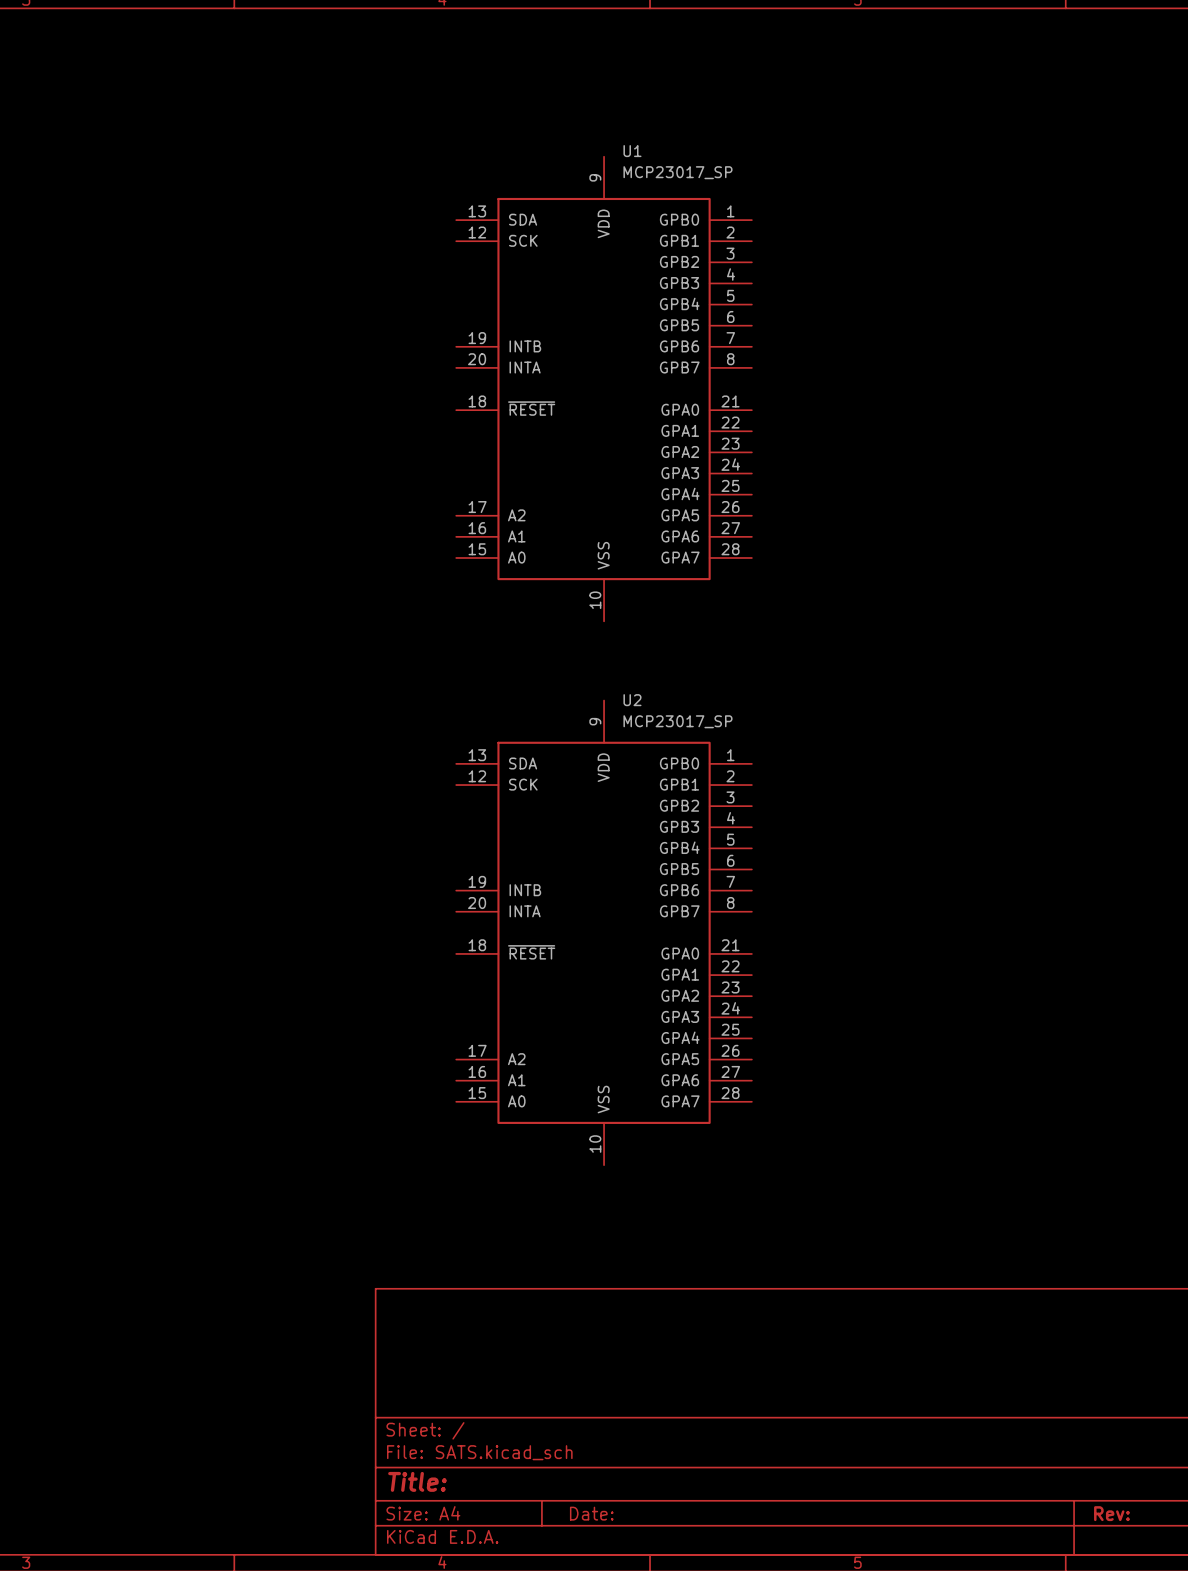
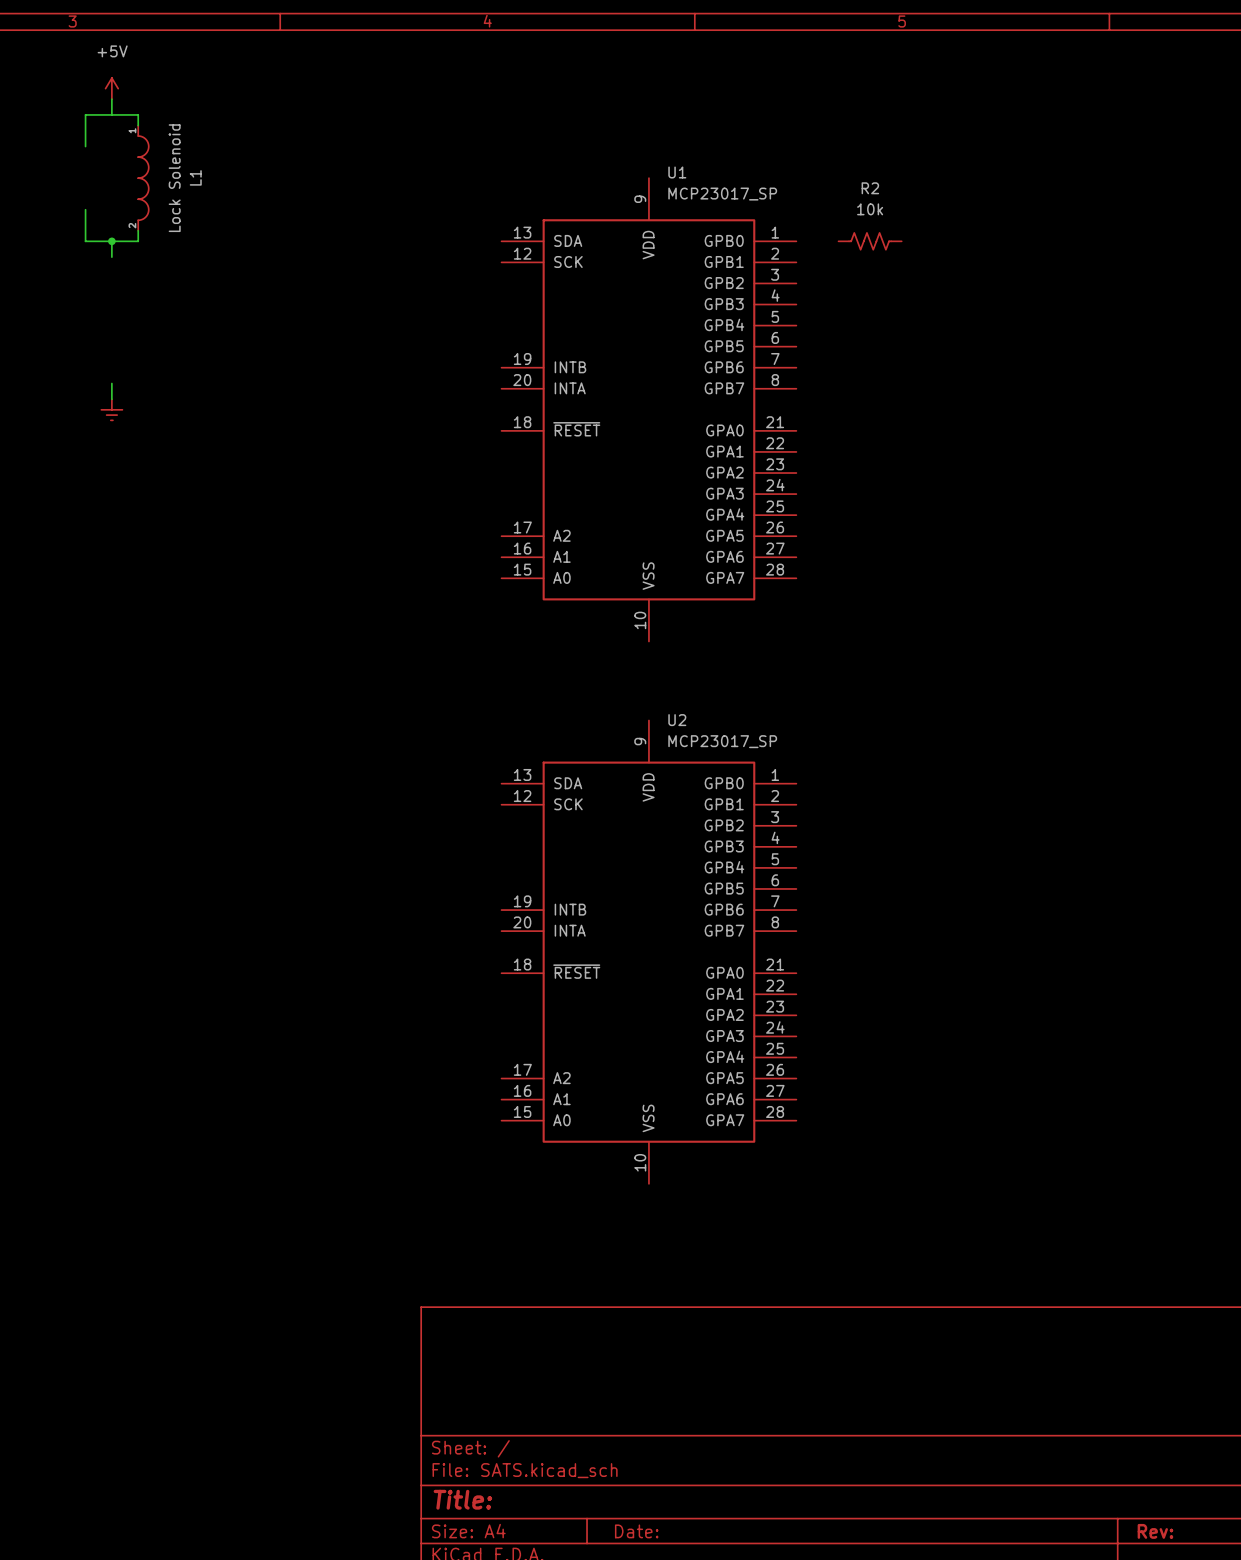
power symbol: none -> +5V (111, 88)
wire: none -> (111, 99) (111, 114)
wire: none -> (138, 125) (138, 114) (85, 114) (85, 146)
L1: none -> Lock Solenoid (143, 178)
wire: none -> (85, 209) (85, 241) (138, 241) (138, 230)
wire: none -> (111, 241) (111, 257)
junction: none -> (111, 241)
R2: none -> 10k (870, 241)
wire: none -> (111, 383) (111, 399)
power symbol: none -> (111, 409)

